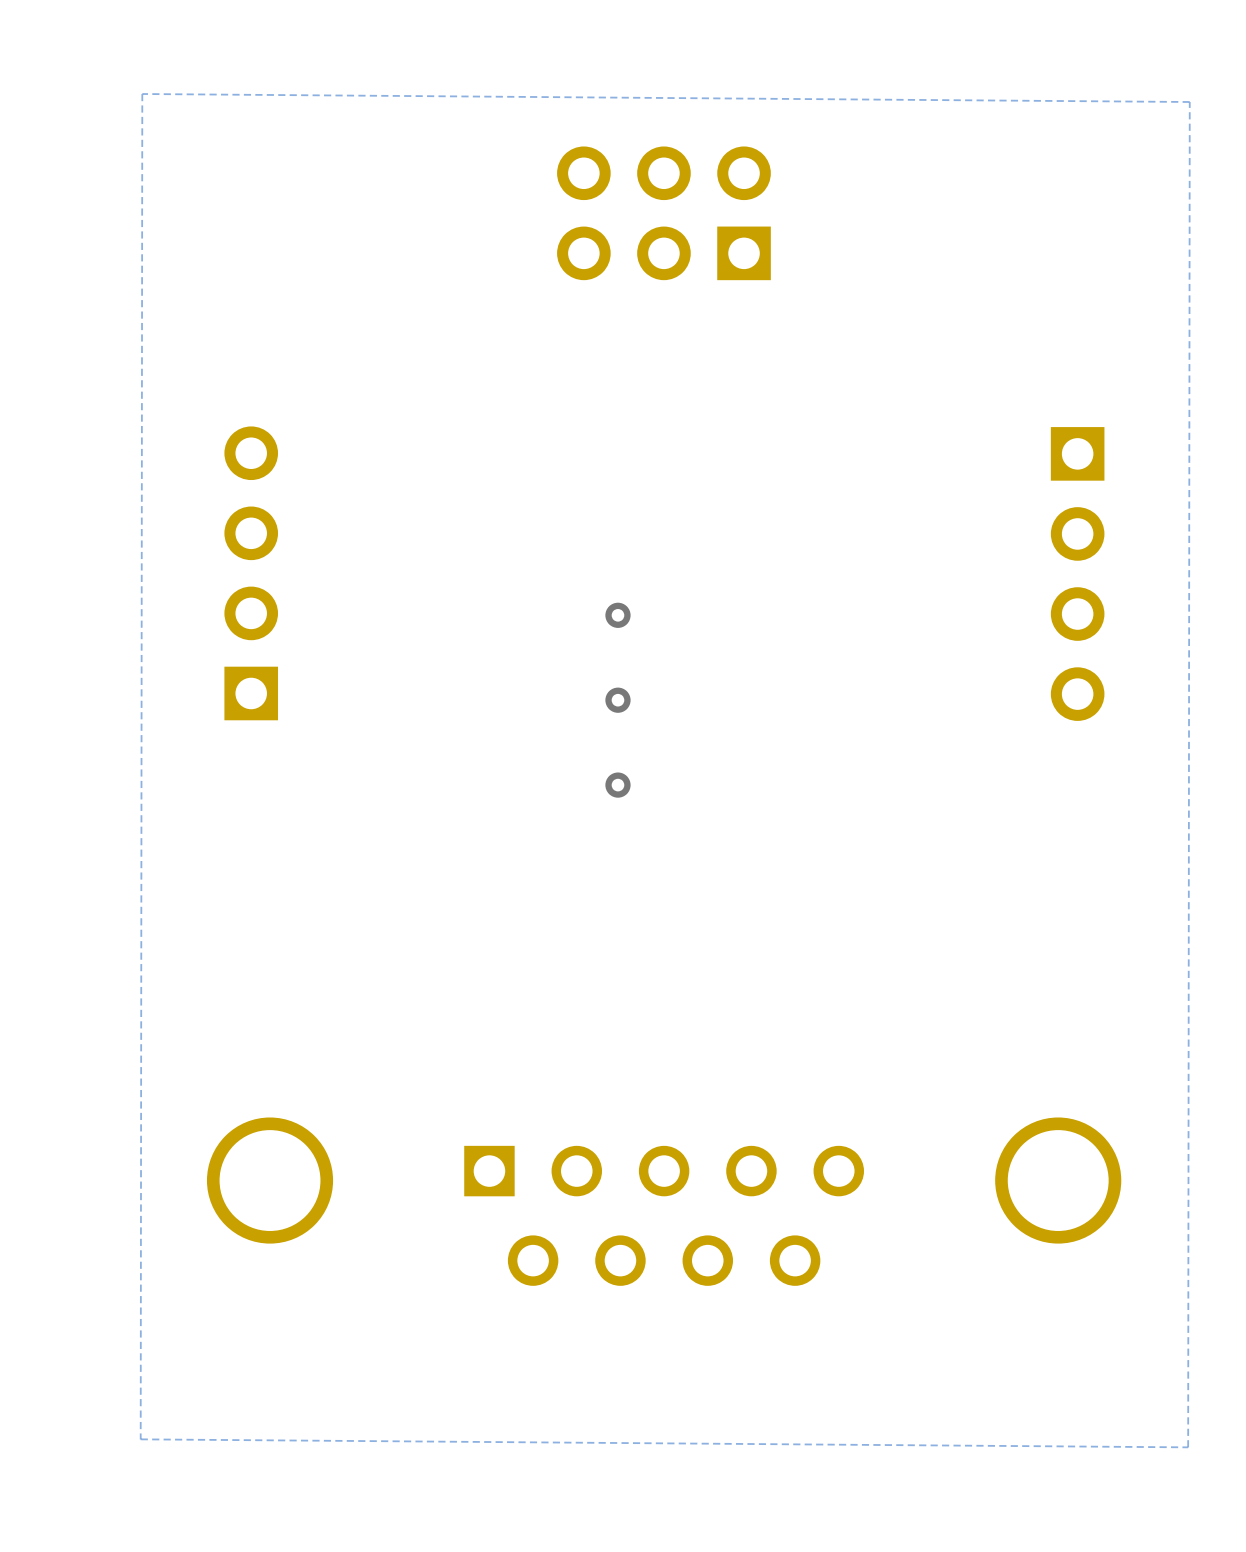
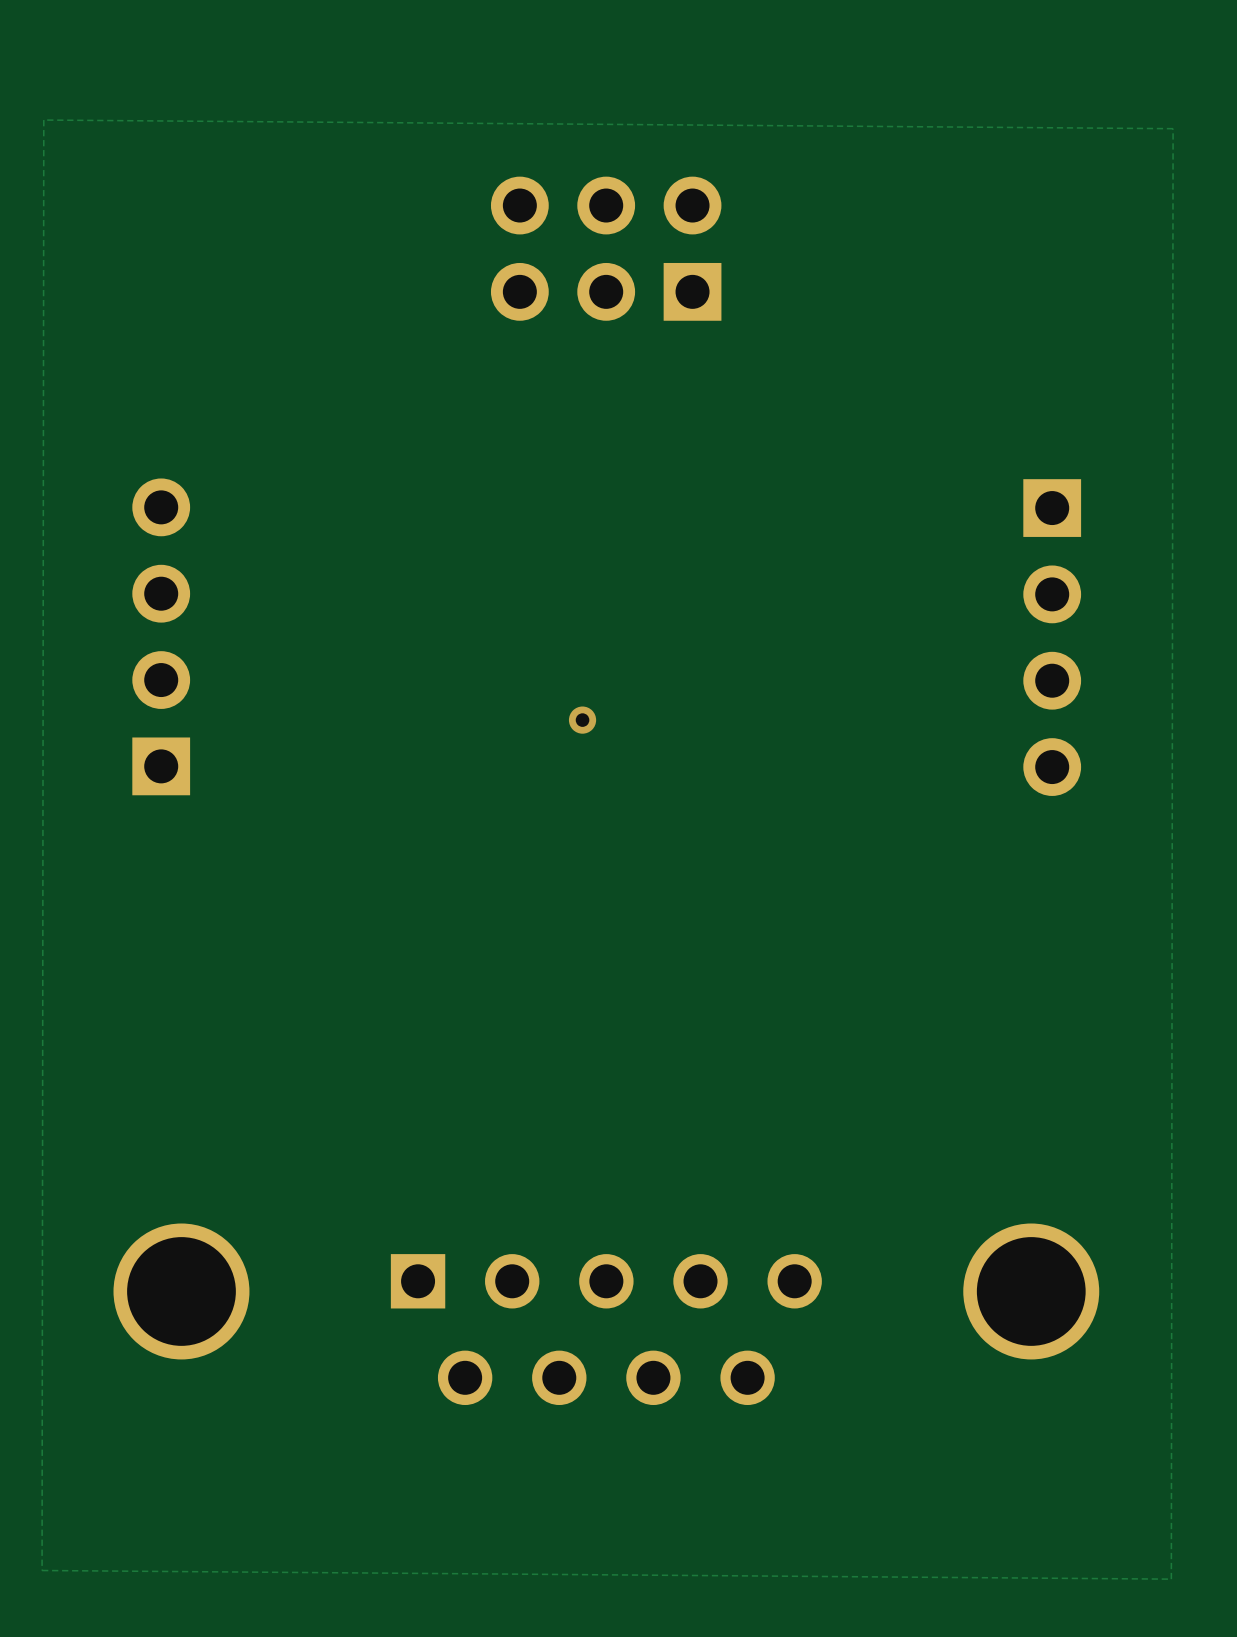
via: (617, 615) -> none
via: none -> (582, 720)
via: (617, 700) -> none
via: (617, 785) -> none

